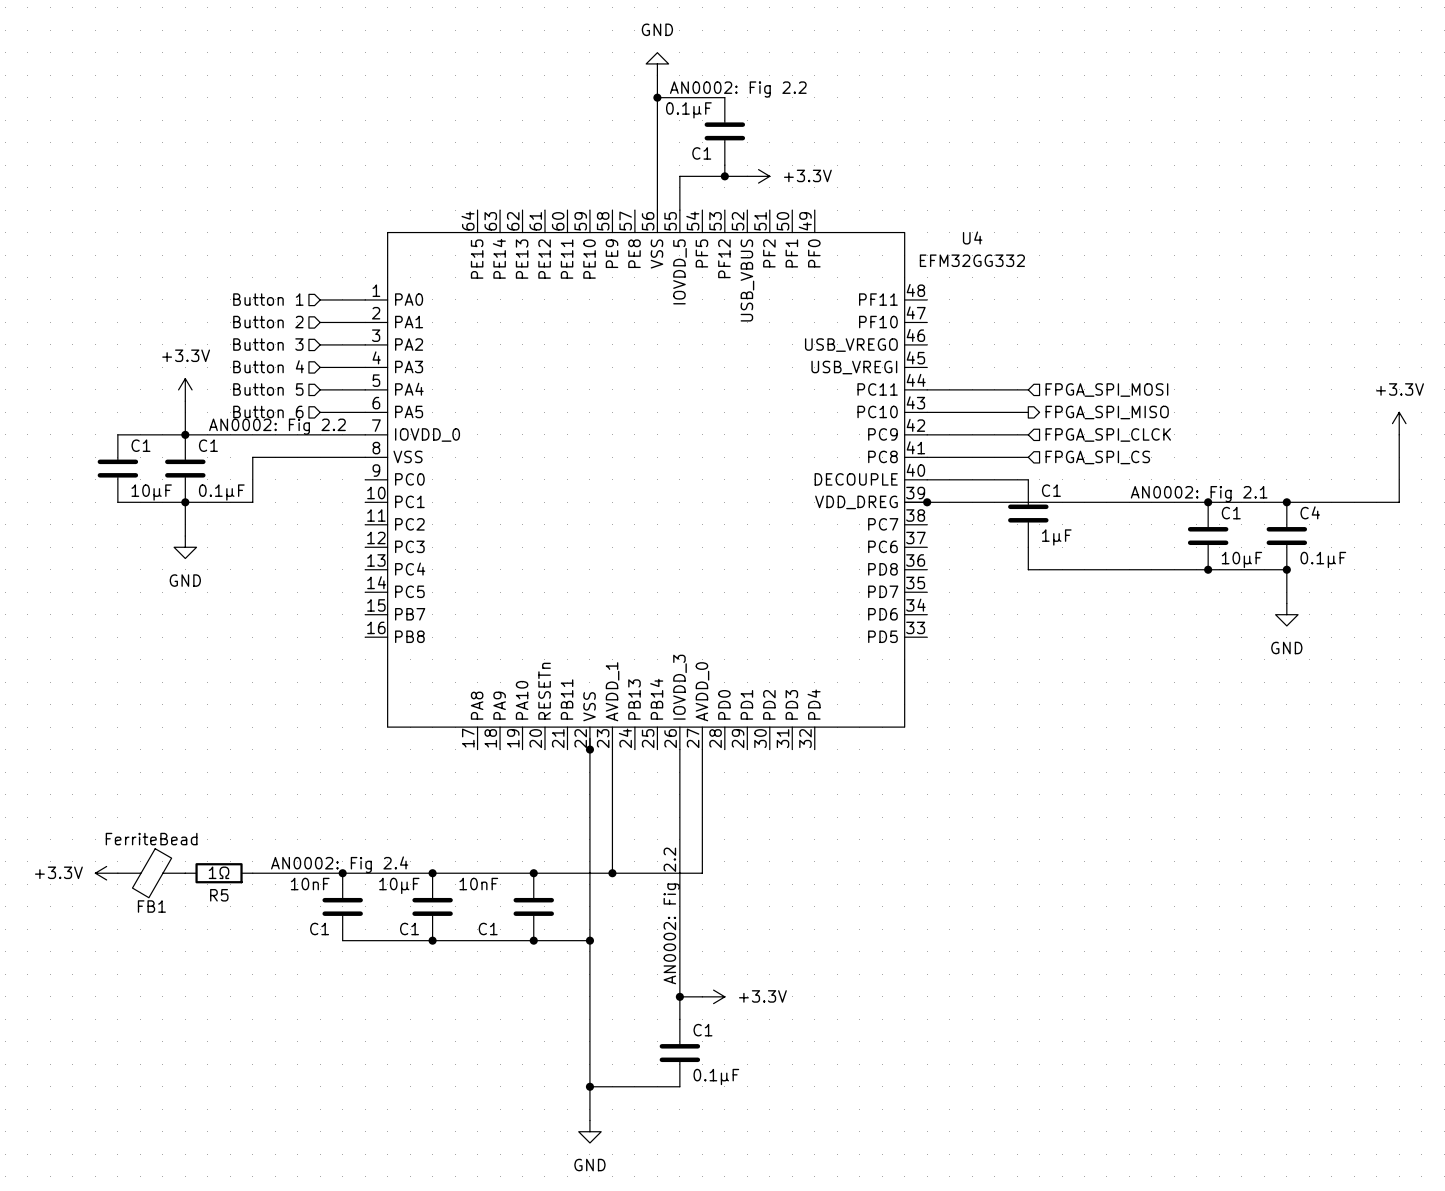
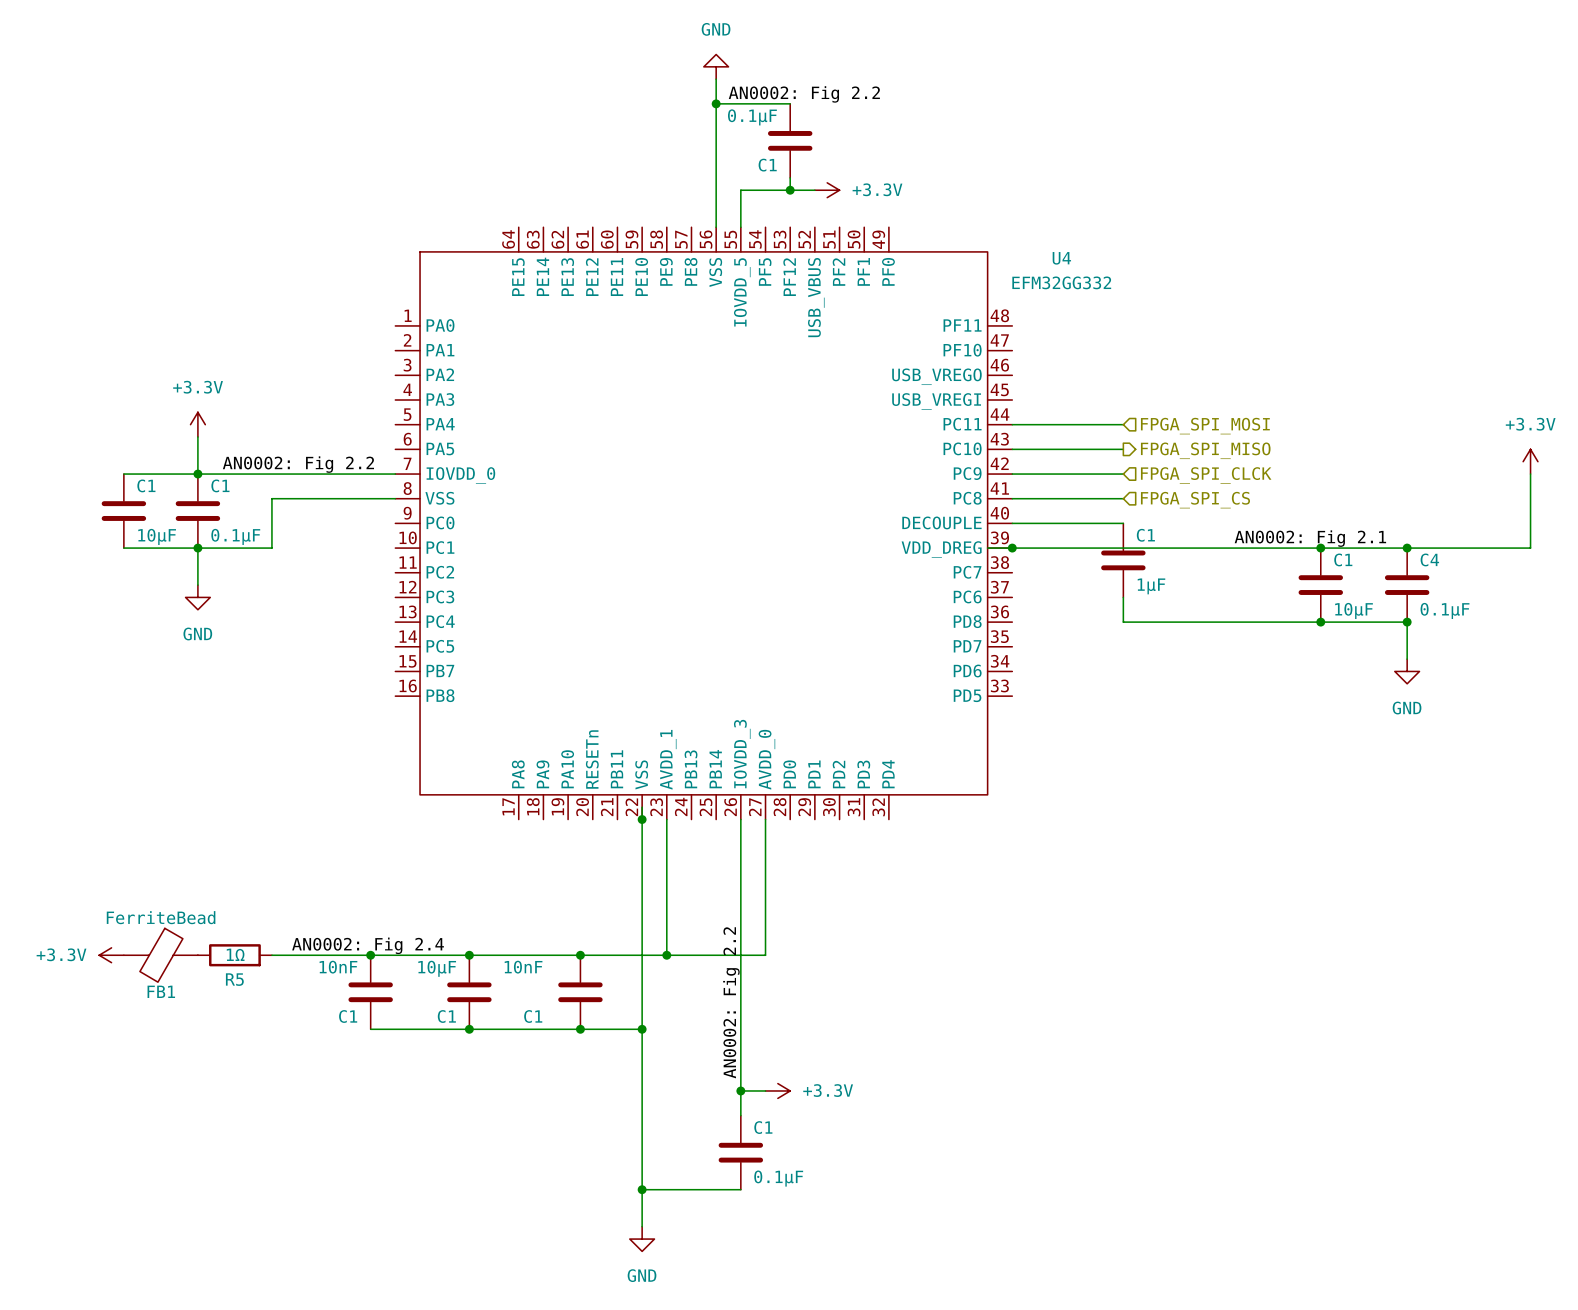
hierarchical label: Button 1 (268, 299) -> none
wire: (320, 299) (365, 299) -> none
hierarchical label: Button 2 (268, 322) -> none
wire: (320, 322) (365, 322) -> none
hierarchical label: Button 3 (268, 344) -> none
wire: (320, 344) (365, 344) -> none
hierarchical label: Button 4 (268, 366) -> none
wire: (320, 367) (365, 367) -> none
hierarchical label: Button 5 (268, 389) -> none
wire: (320, 389) (365, 389) -> none
hierarchical label: Button 6 (268, 411) -> none
wire: (320, 412) (365, 412) -> none

